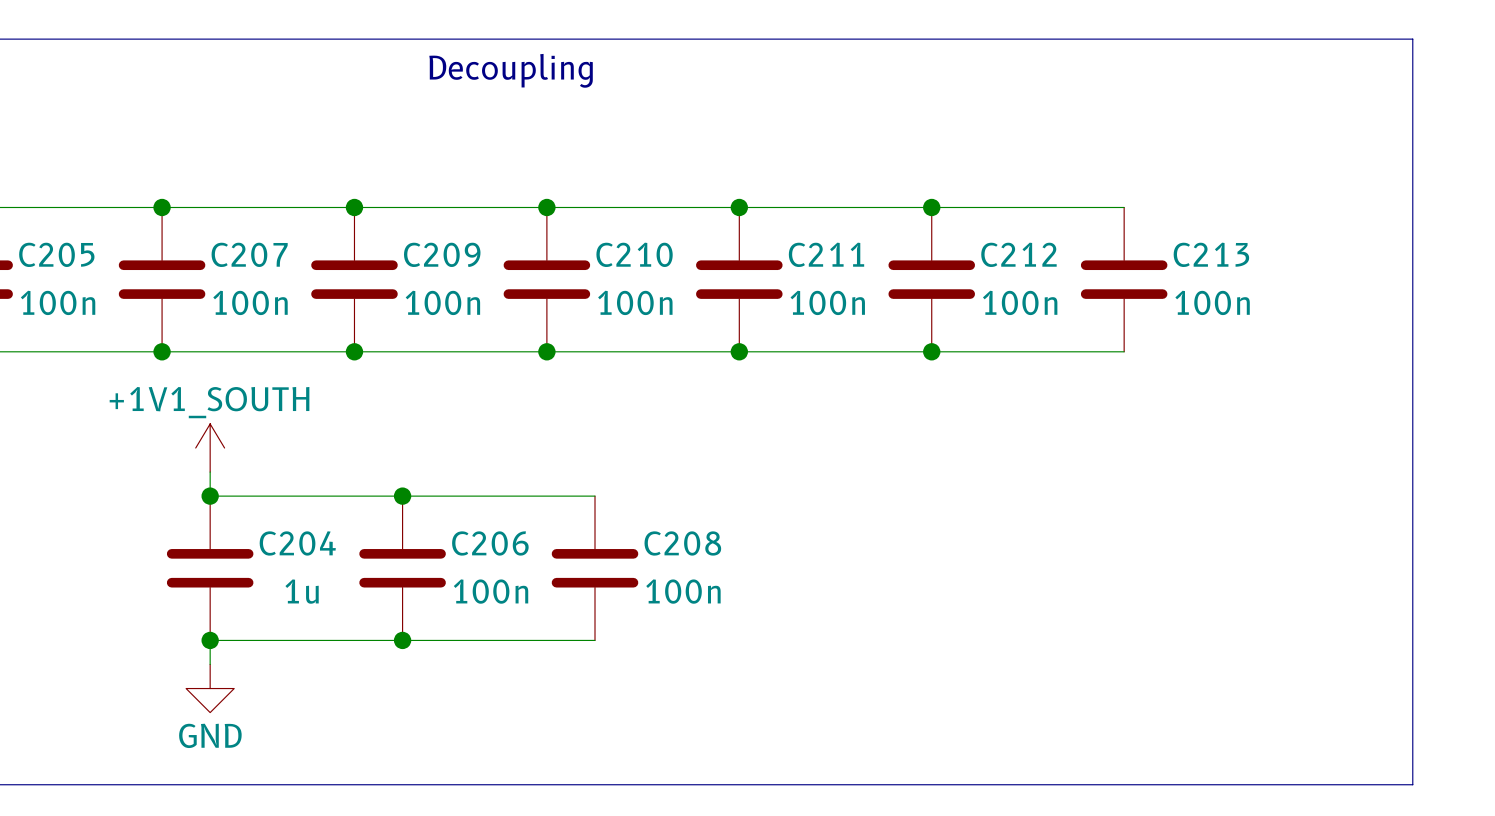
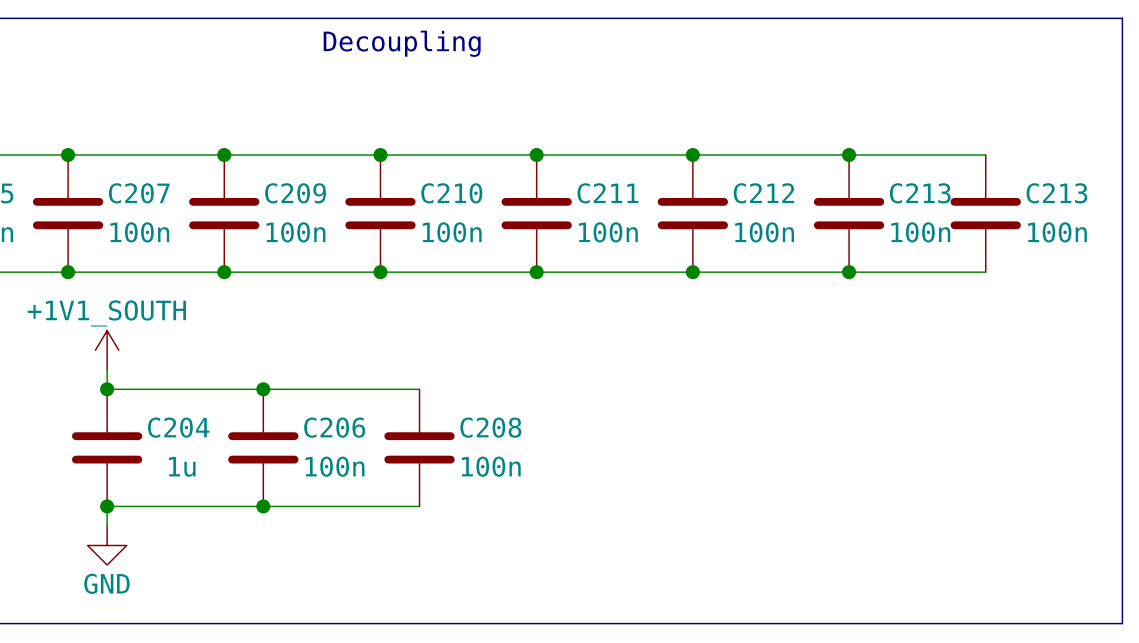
line: (1412, 39) (1412, 784) -> (1083, 18) (1122, 18) (1122, 623) (1083, 623)
text position: Decoupling (511, 70) -> Decoupling (402, 43)
wire: none -> (849, 155) (985, 155)
junction: none -> (849, 155)
C213: none -> 100n (985, 213)
wire: none -> (849, 272) (985, 272)
junction: none -> (849, 272)

